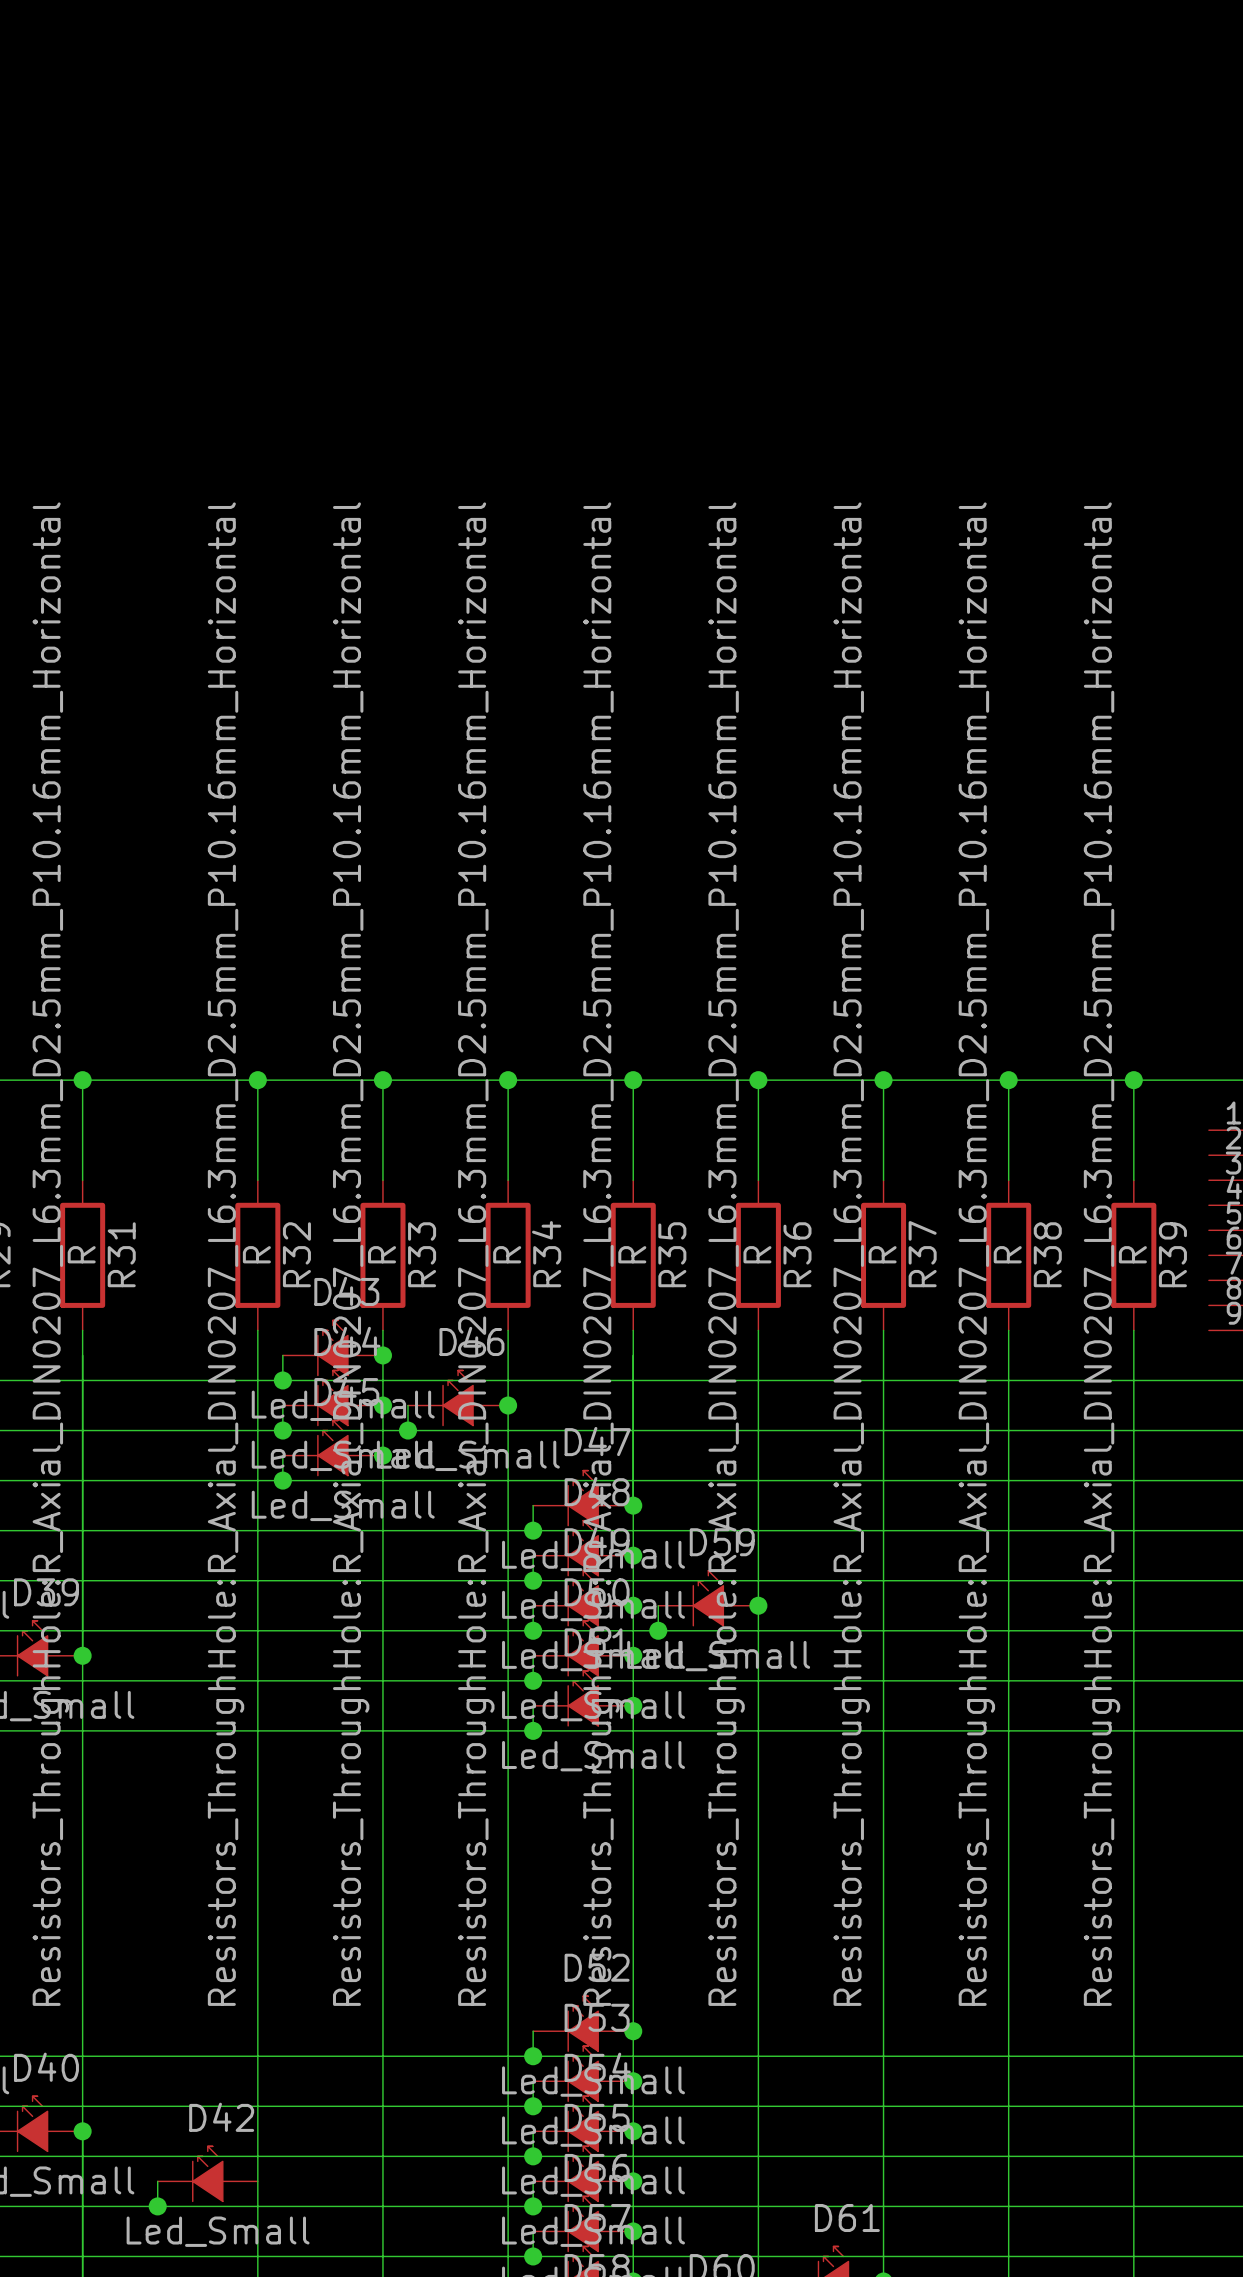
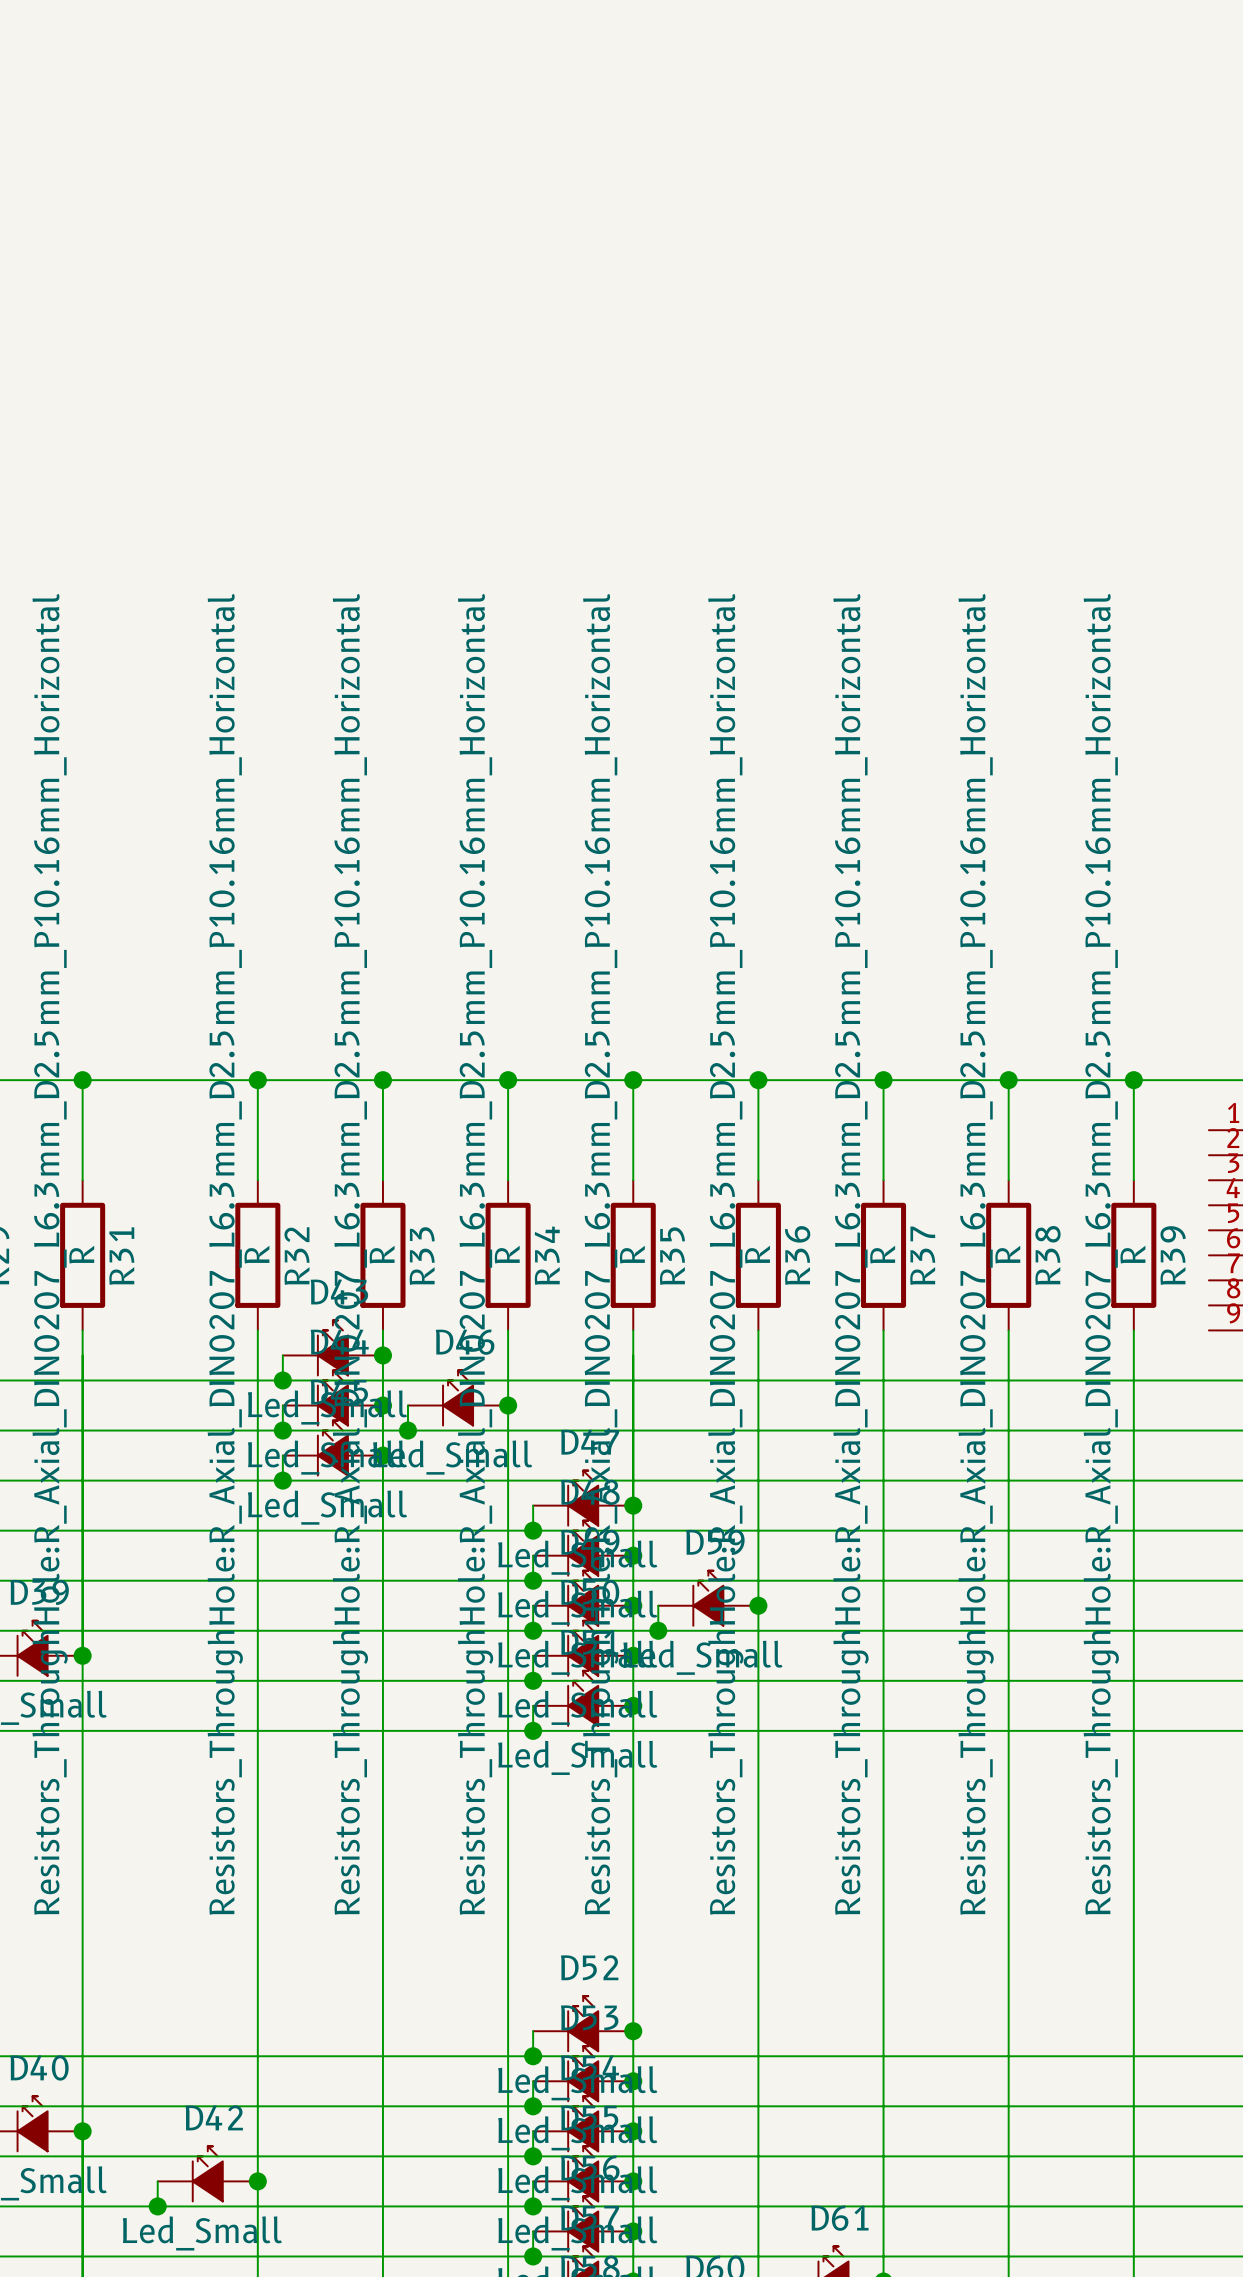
junction: none -> (257, 2181)

